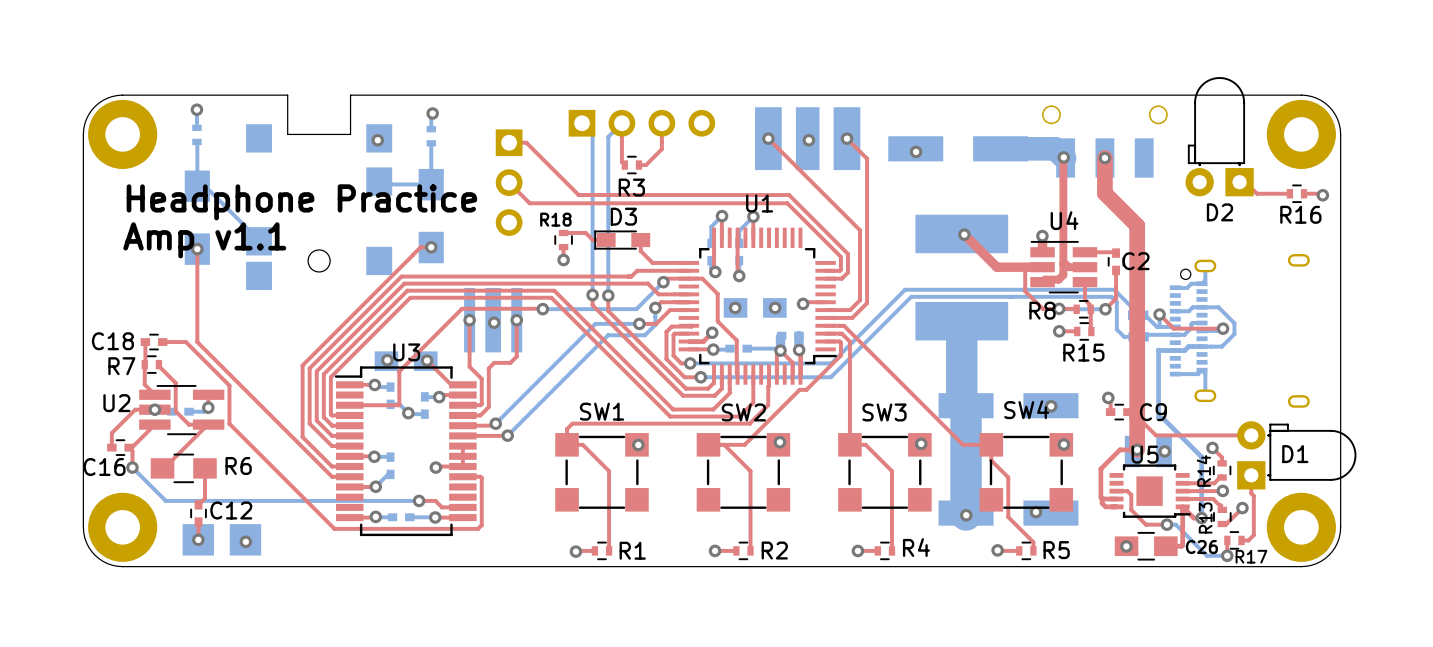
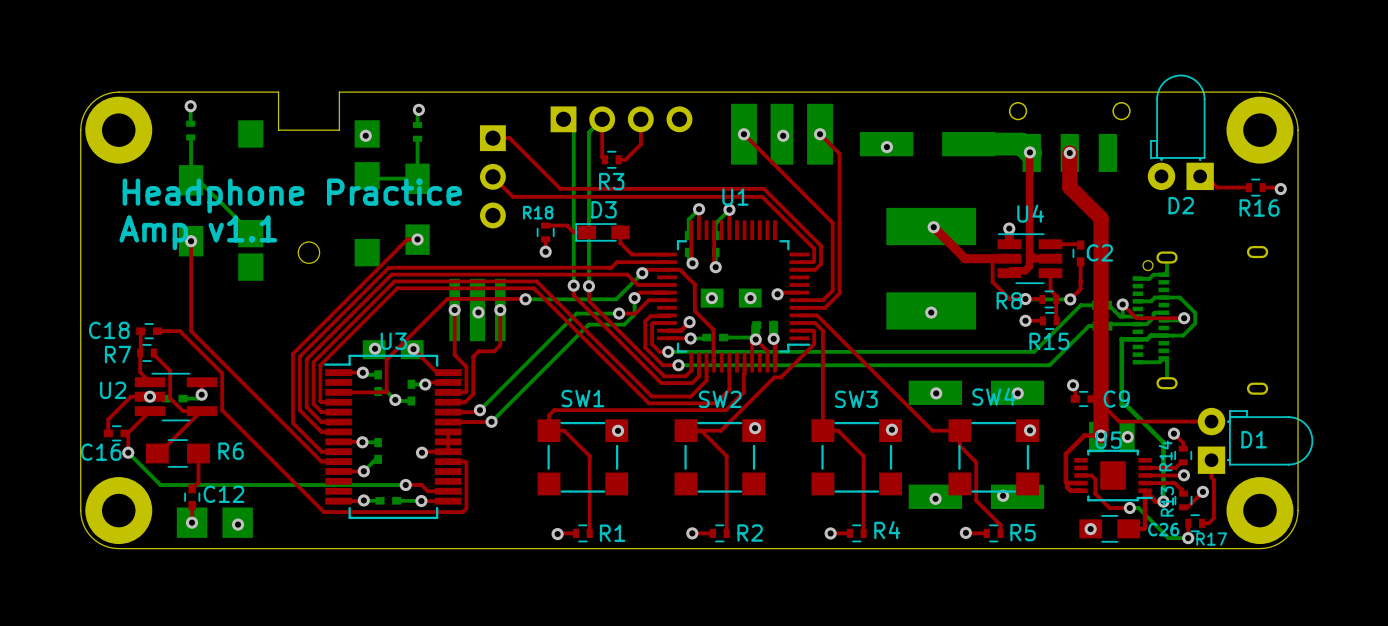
bottom track: (1131, 315) (1131, 306) (1114, 289) (905, 289) (831, 363) -> (1095, 305) (1080, 305) (1034, 351) (804, 351)
bottom track: (961, 321) (961, 401) (966, 405) (966, 515) -> none
via: none -> (931, 312)
bottom track: (1124, 336) (1116, 329) (1116, 302) (1111, 296) (911, 296) (830, 377) -> (1088, 326) (1049, 365) (804, 365)
via: none -> (936, 393)

